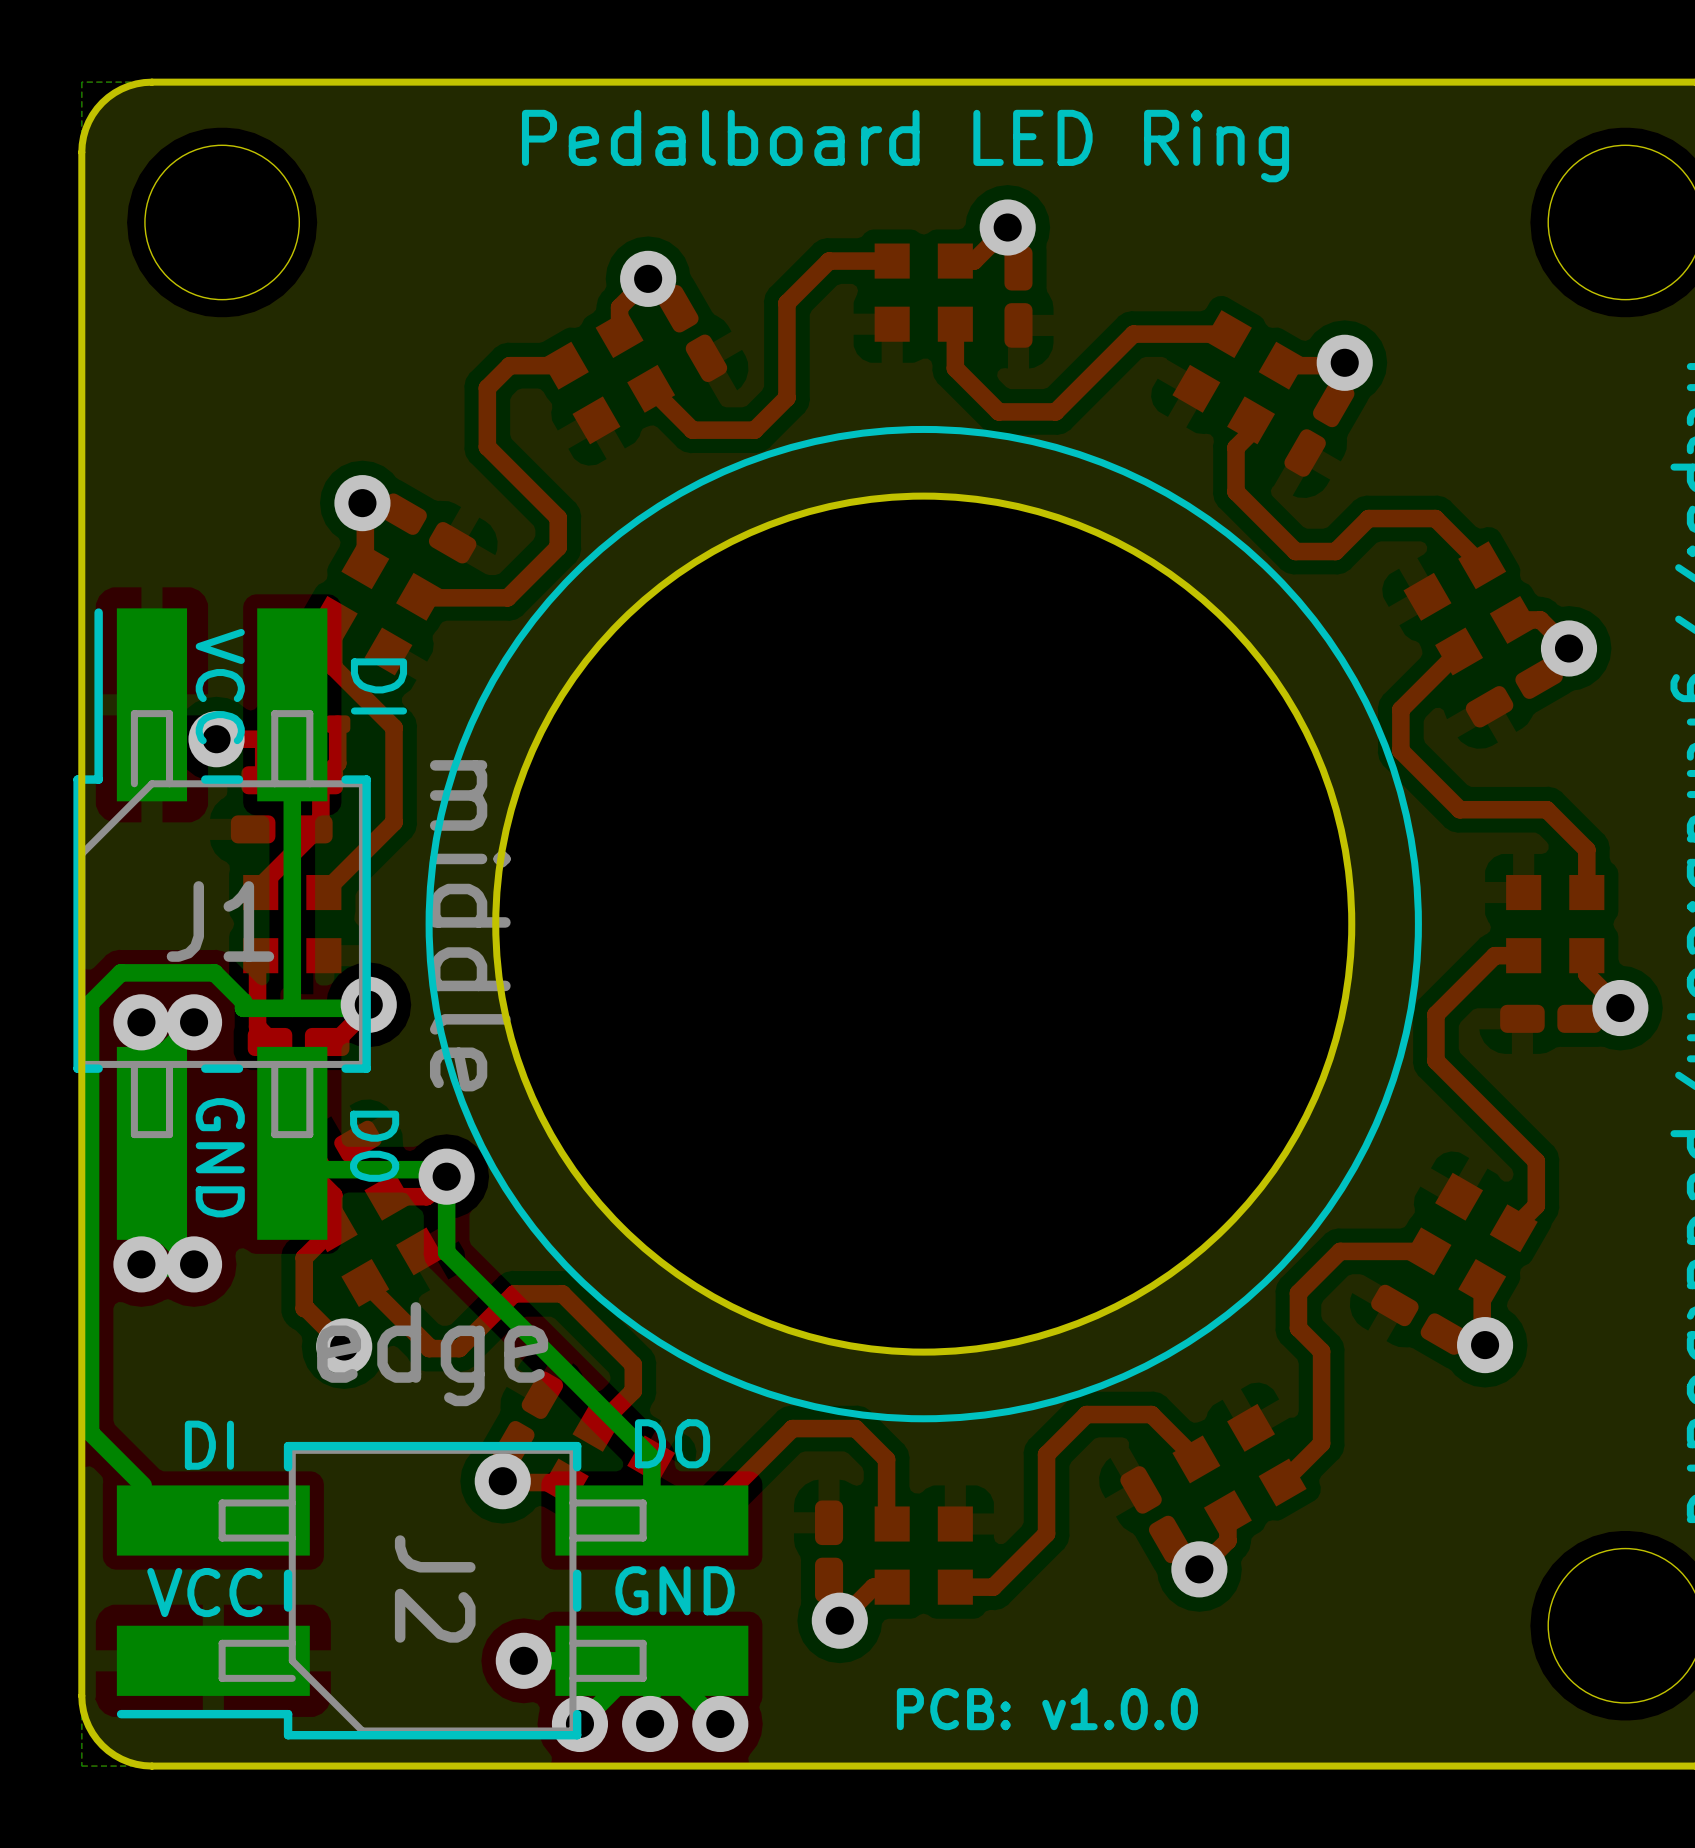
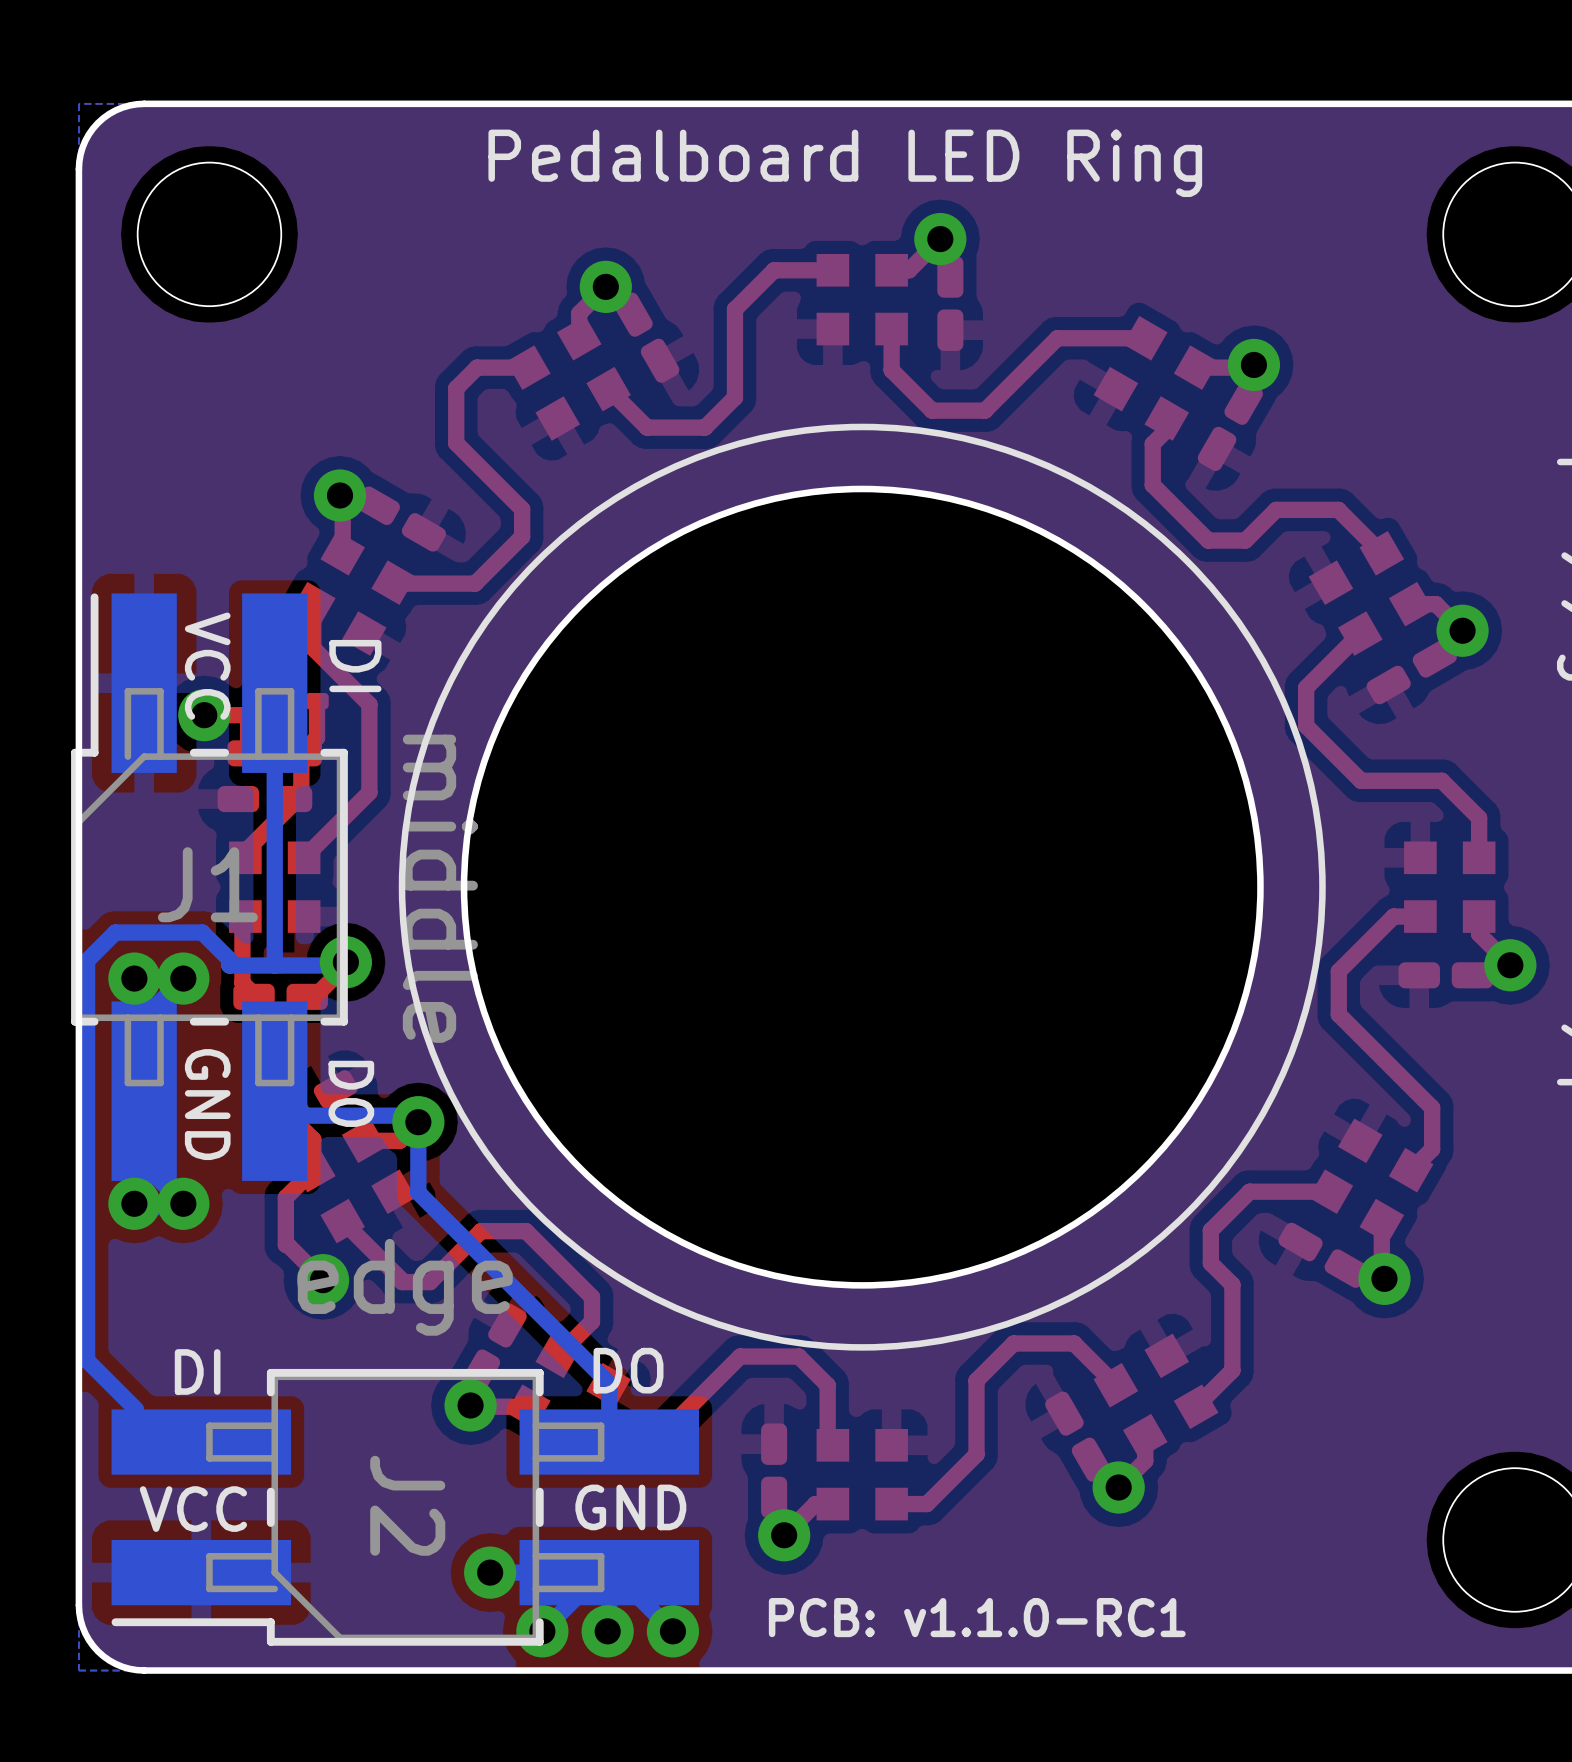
text: PCB: v1.0.0 (1047, 1709) -> PCB: v1.1.0-RC1 (977, 1617)

